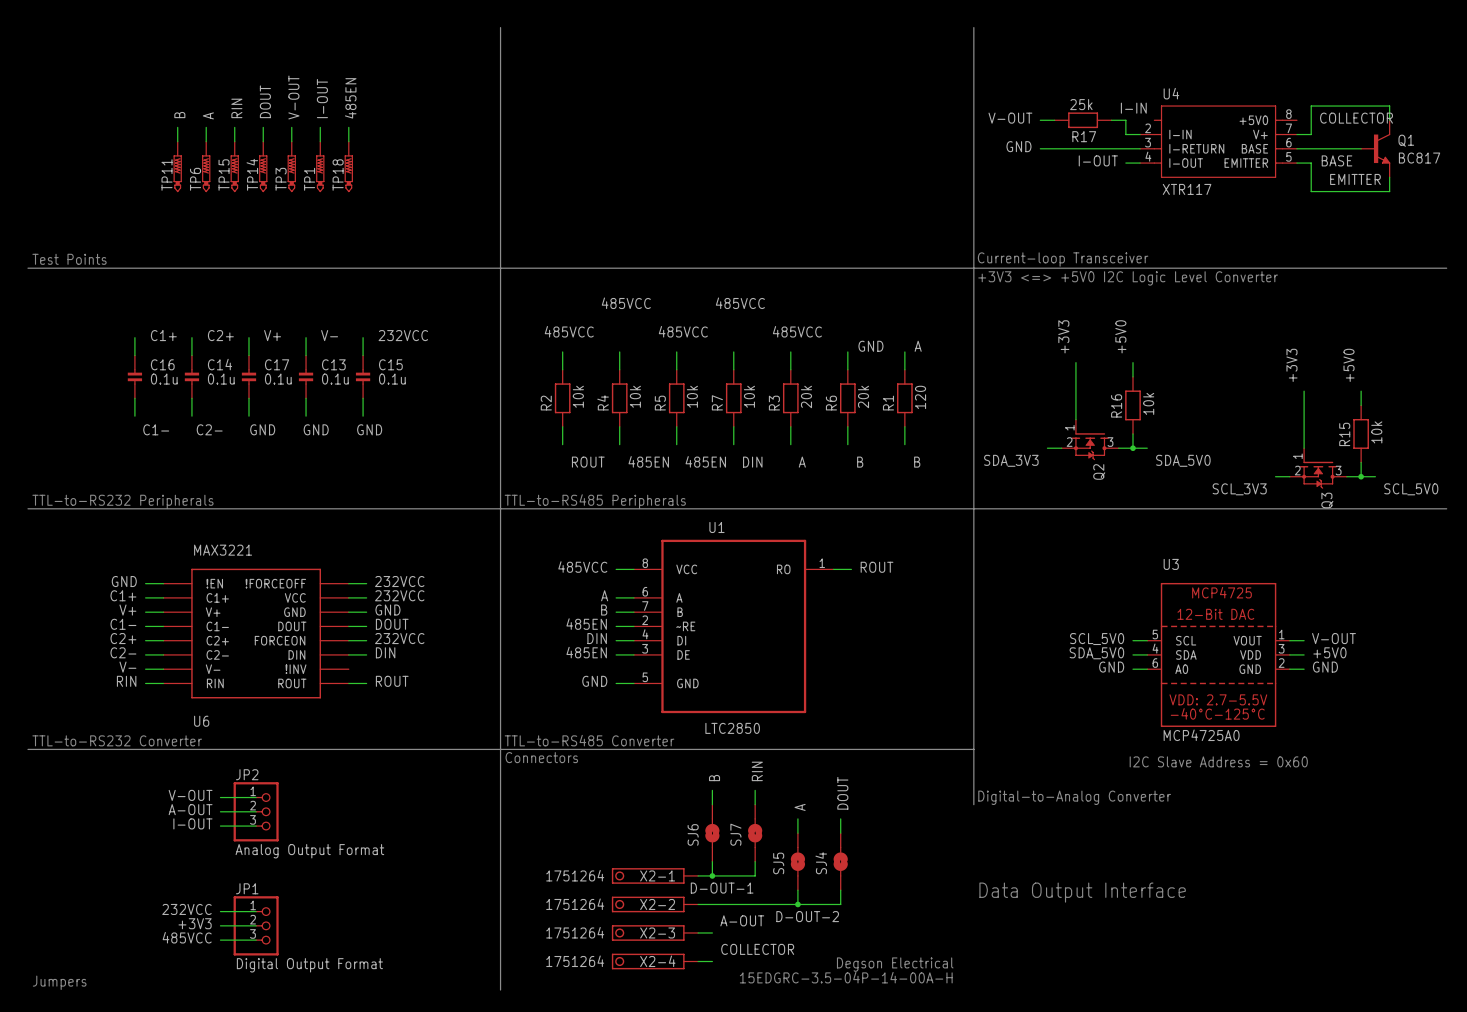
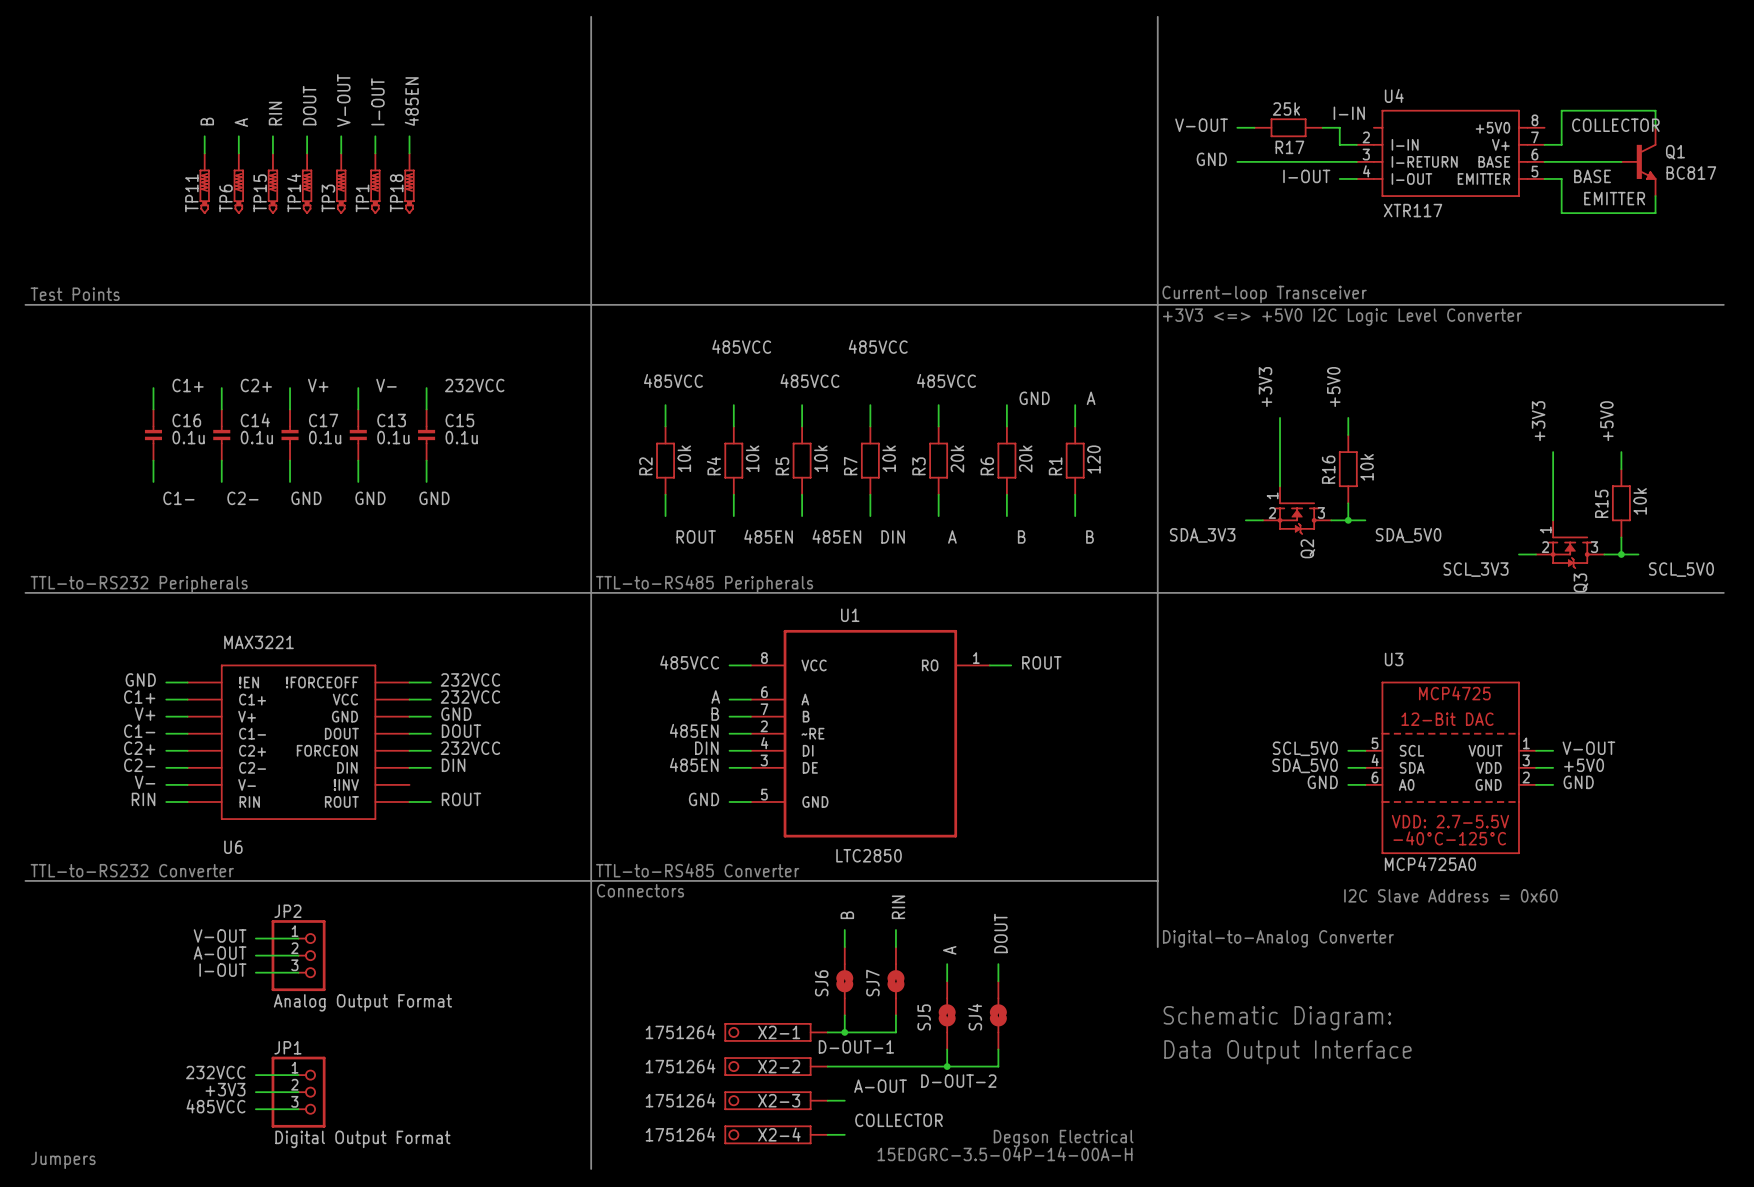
text: none -> Schematic Diagram: (1277, 1018)

